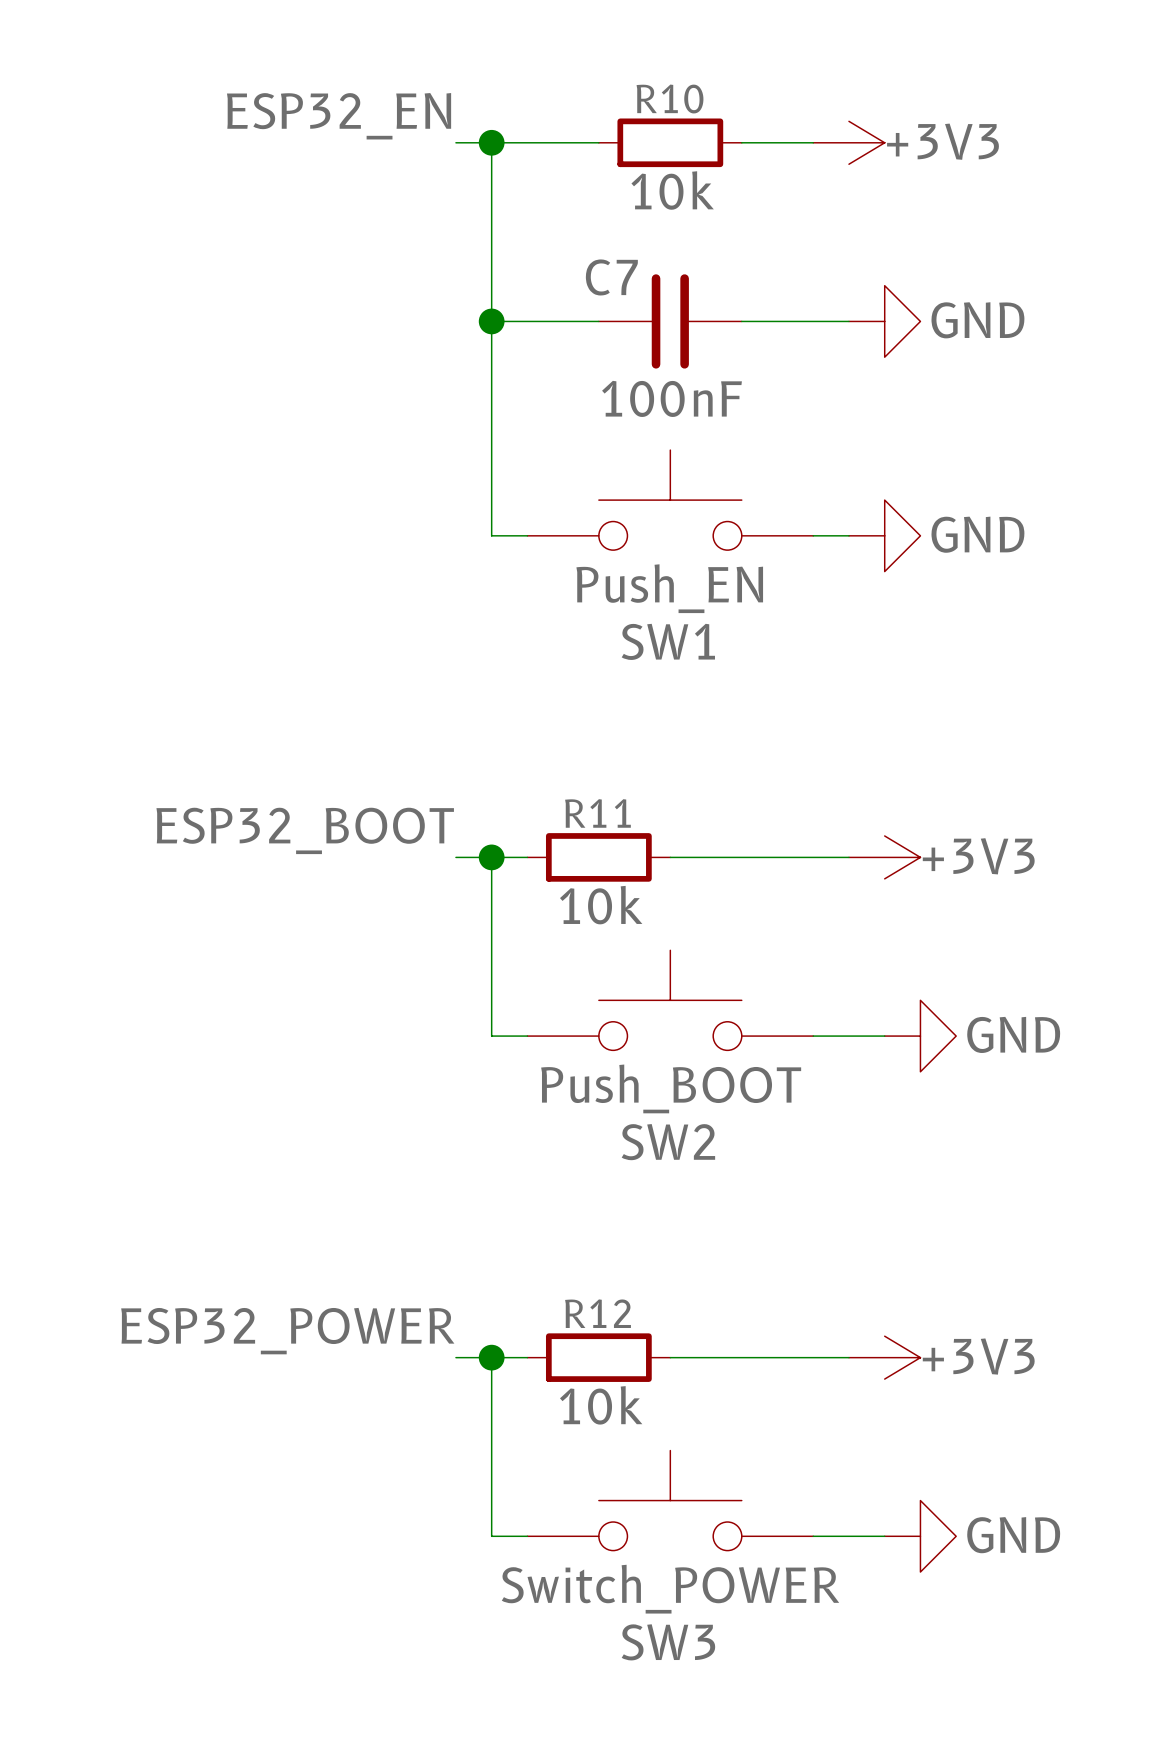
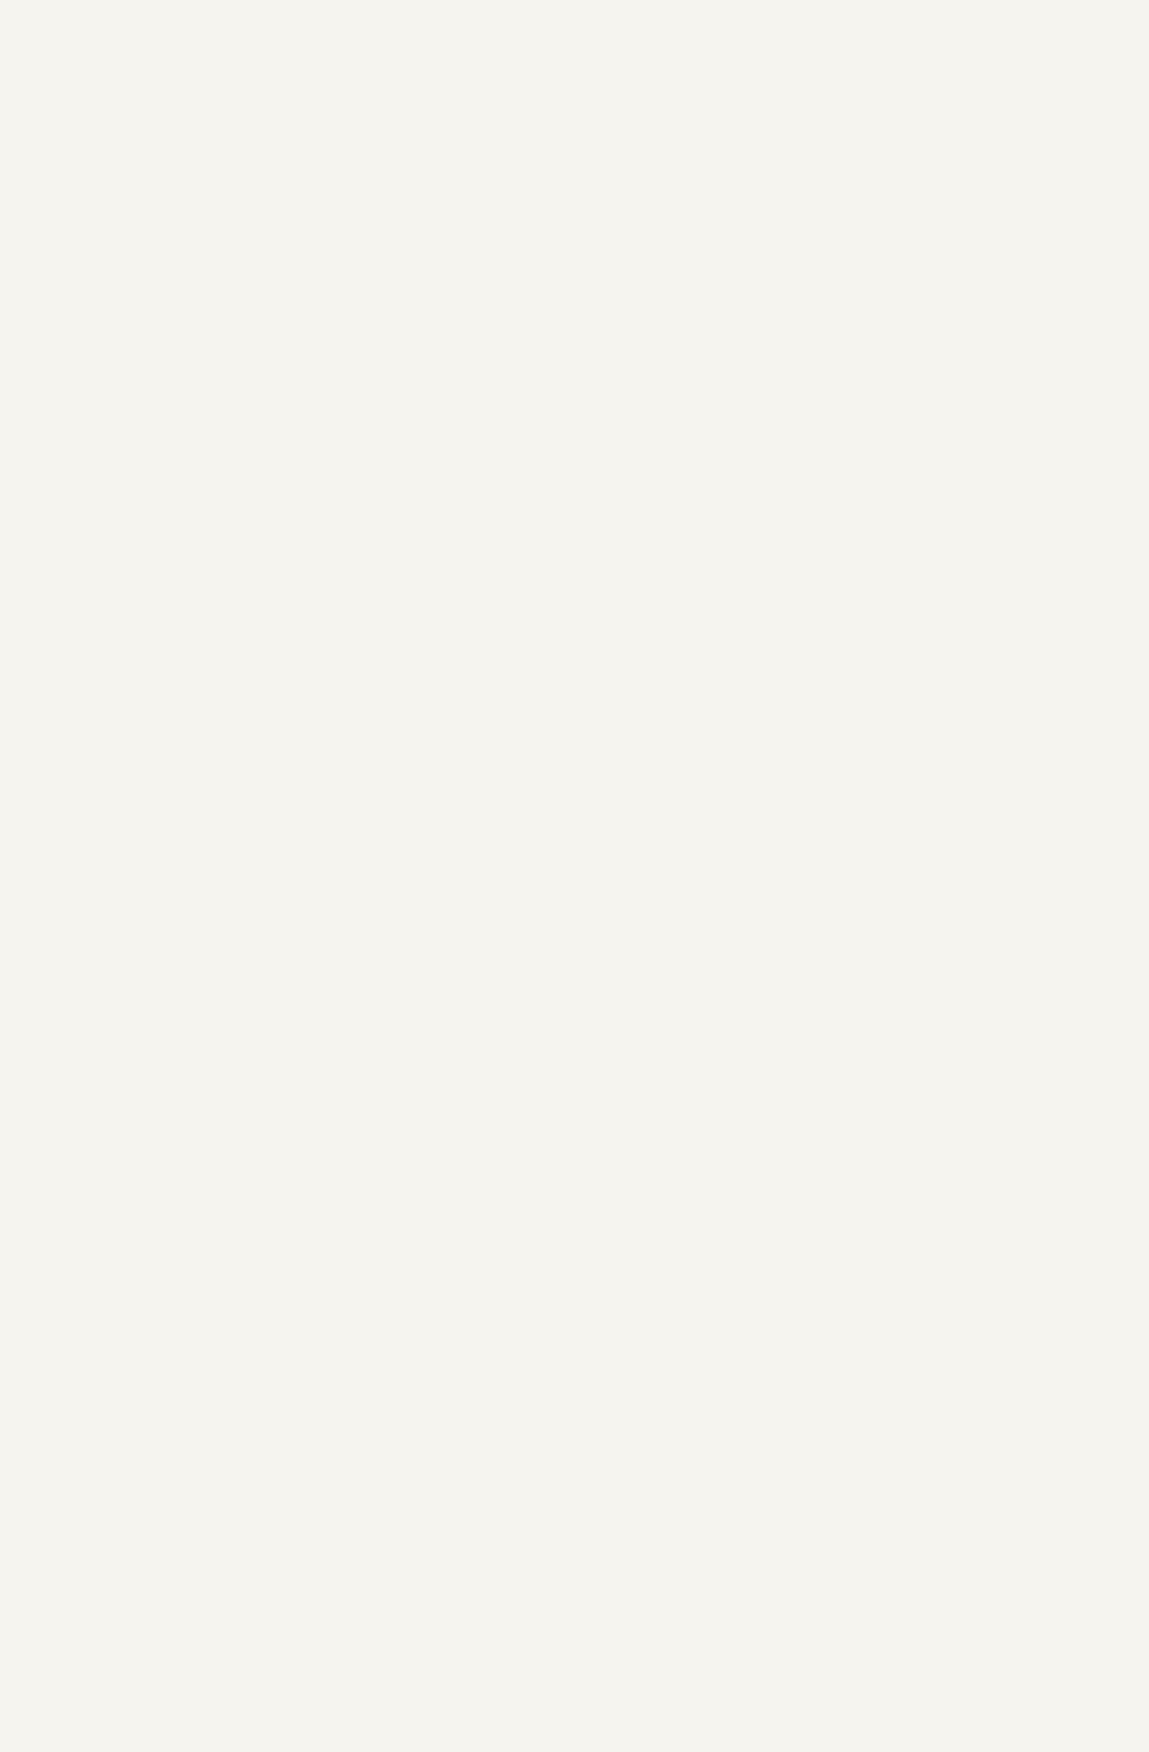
label: ESP32_EN (339, 116) -> none
wire: (455, 142) (598, 142) -> none
wire: (491, 142) (491, 535) (527, 535) -> none
junction: (491, 142) -> none
R10: 10k (670, 142) -> none
wire: (741, 142) (813, 142) -> none
power symbol: +3V3 (848, 142) -> none
wire: (491, 321) (598, 321) -> none
junction: (491, 321) -> none
C7: 100nF (670, 321) -> none
wire: (741, 321) (848, 321) -> none
power symbol: GND (884, 321) -> none
SW1: Push_EN (670, 500) -> none
wire: (813, 535) (848, 535) -> none
power symbol: GND (884, 535) -> none
label: ESP32_BOOT (305, 830) -> none
wire: (455, 857) (527, 857) -> none
wire: (491, 857) (491, 1036) (527, 1036) -> none
junction: (491, 857) -> none
R11: 10k (598, 857) -> none
wire: (670, 857) (848, 857) -> none
power symbol: +3V3 (884, 857) -> none
SW2: Push_BOOT (670, 1000) -> none
wire: (813, 1036) (884, 1036) -> none
power symbol: GND (920, 1036) -> none
label: ESP32_POWER (287, 1331) -> none
wire: (455, 1357) (527, 1357) -> none
wire: (491, 1357) (491, 1536) (527, 1536) -> none
junction: (491, 1357) -> none
R12: 10k (598, 1357) -> none
wire: (670, 1357) (848, 1357) -> none
power symbol: +3V3 (884, 1357) -> none
SW3: Switch_POWER (670, 1500) -> none
wire: (813, 1536) (884, 1536) -> none
power symbol: GND (920, 1536) -> none

